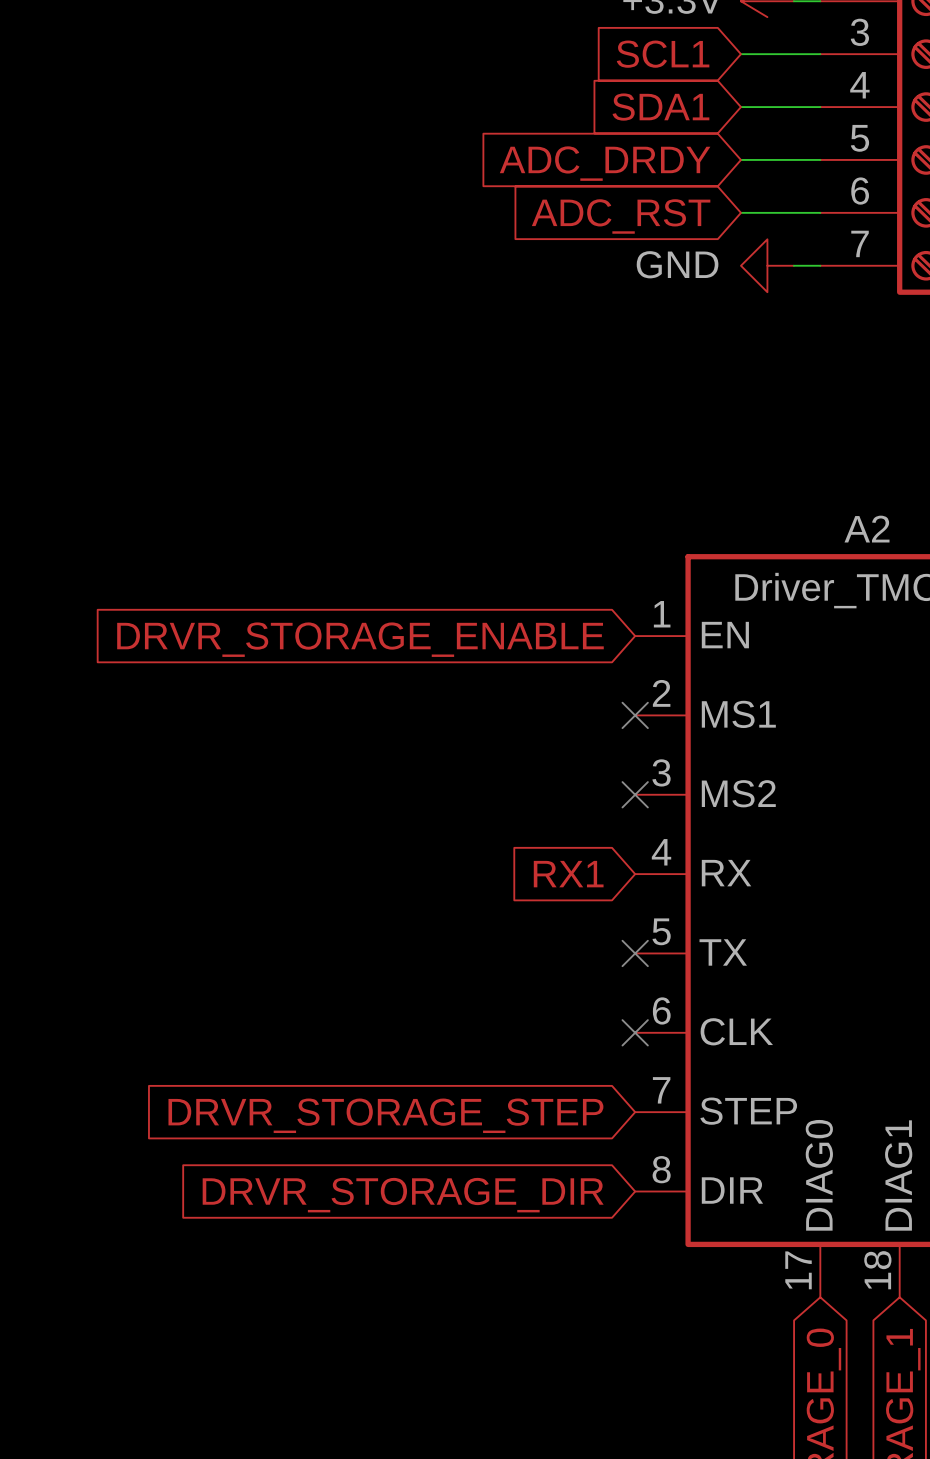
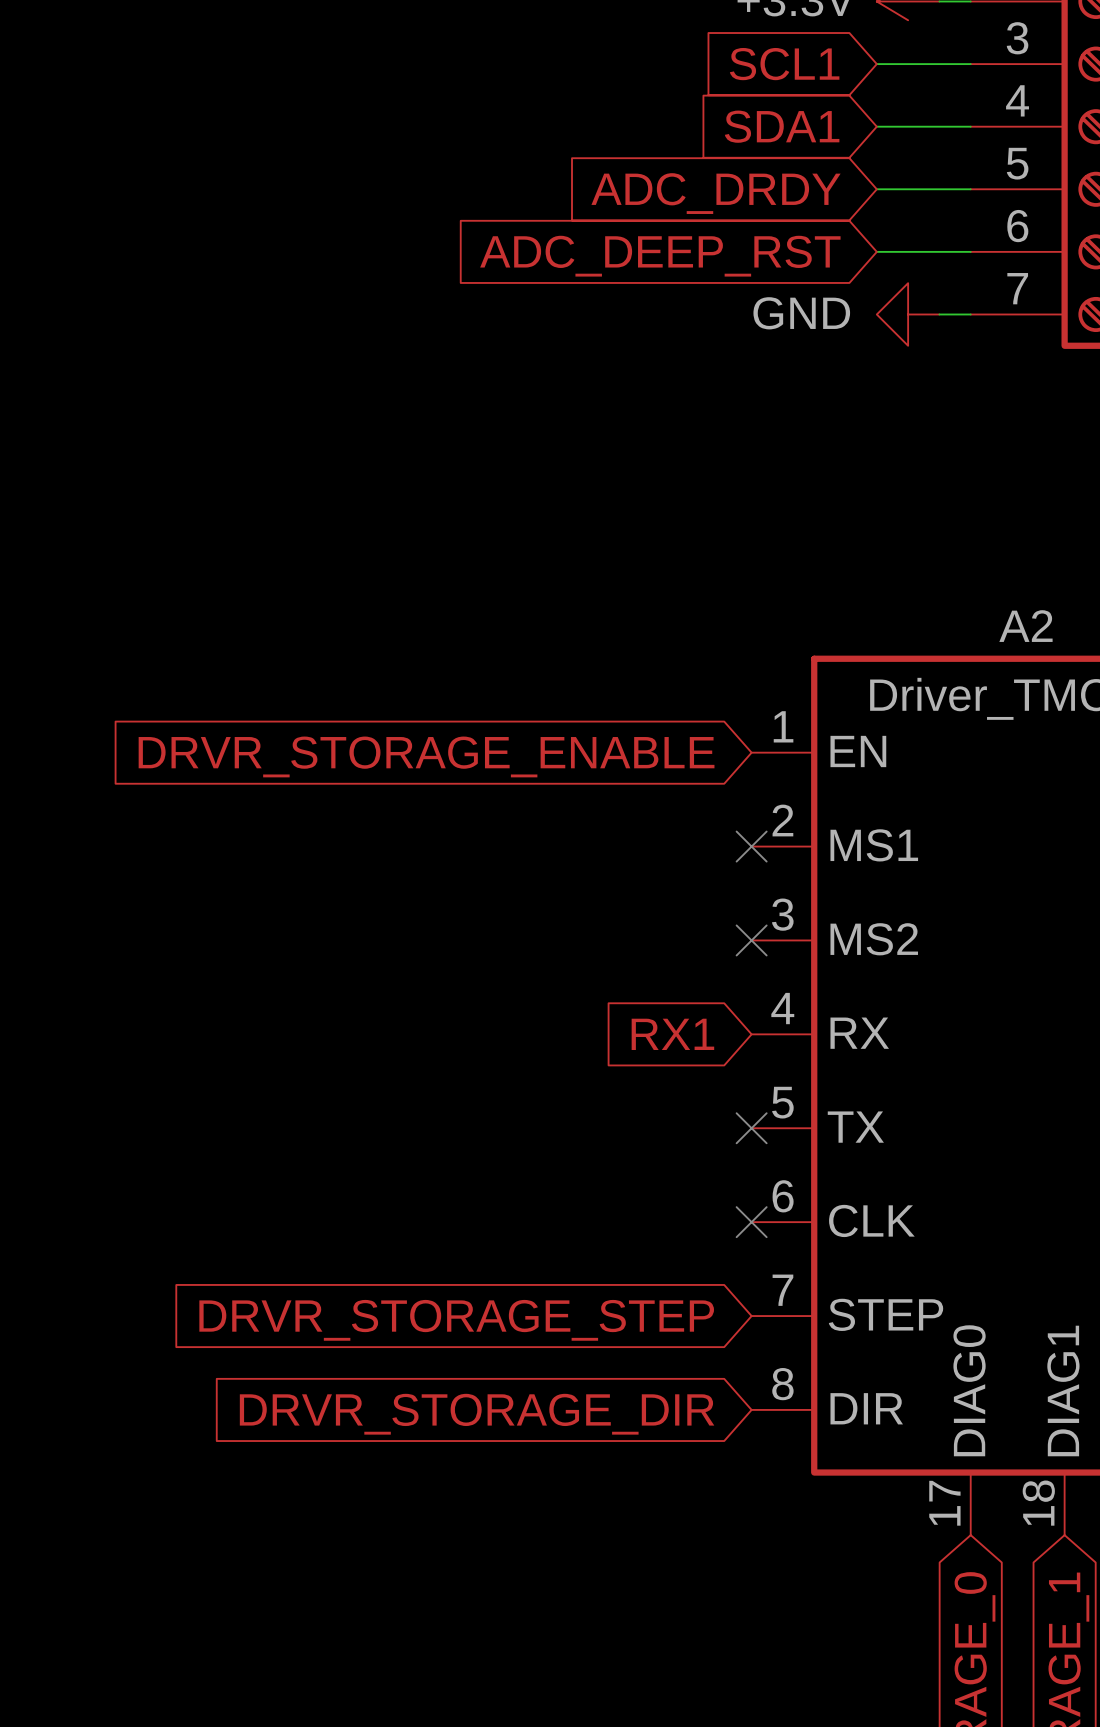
global label: ADC_RST (621, 216) -> ADC_DEEP_RST (660, 256)

